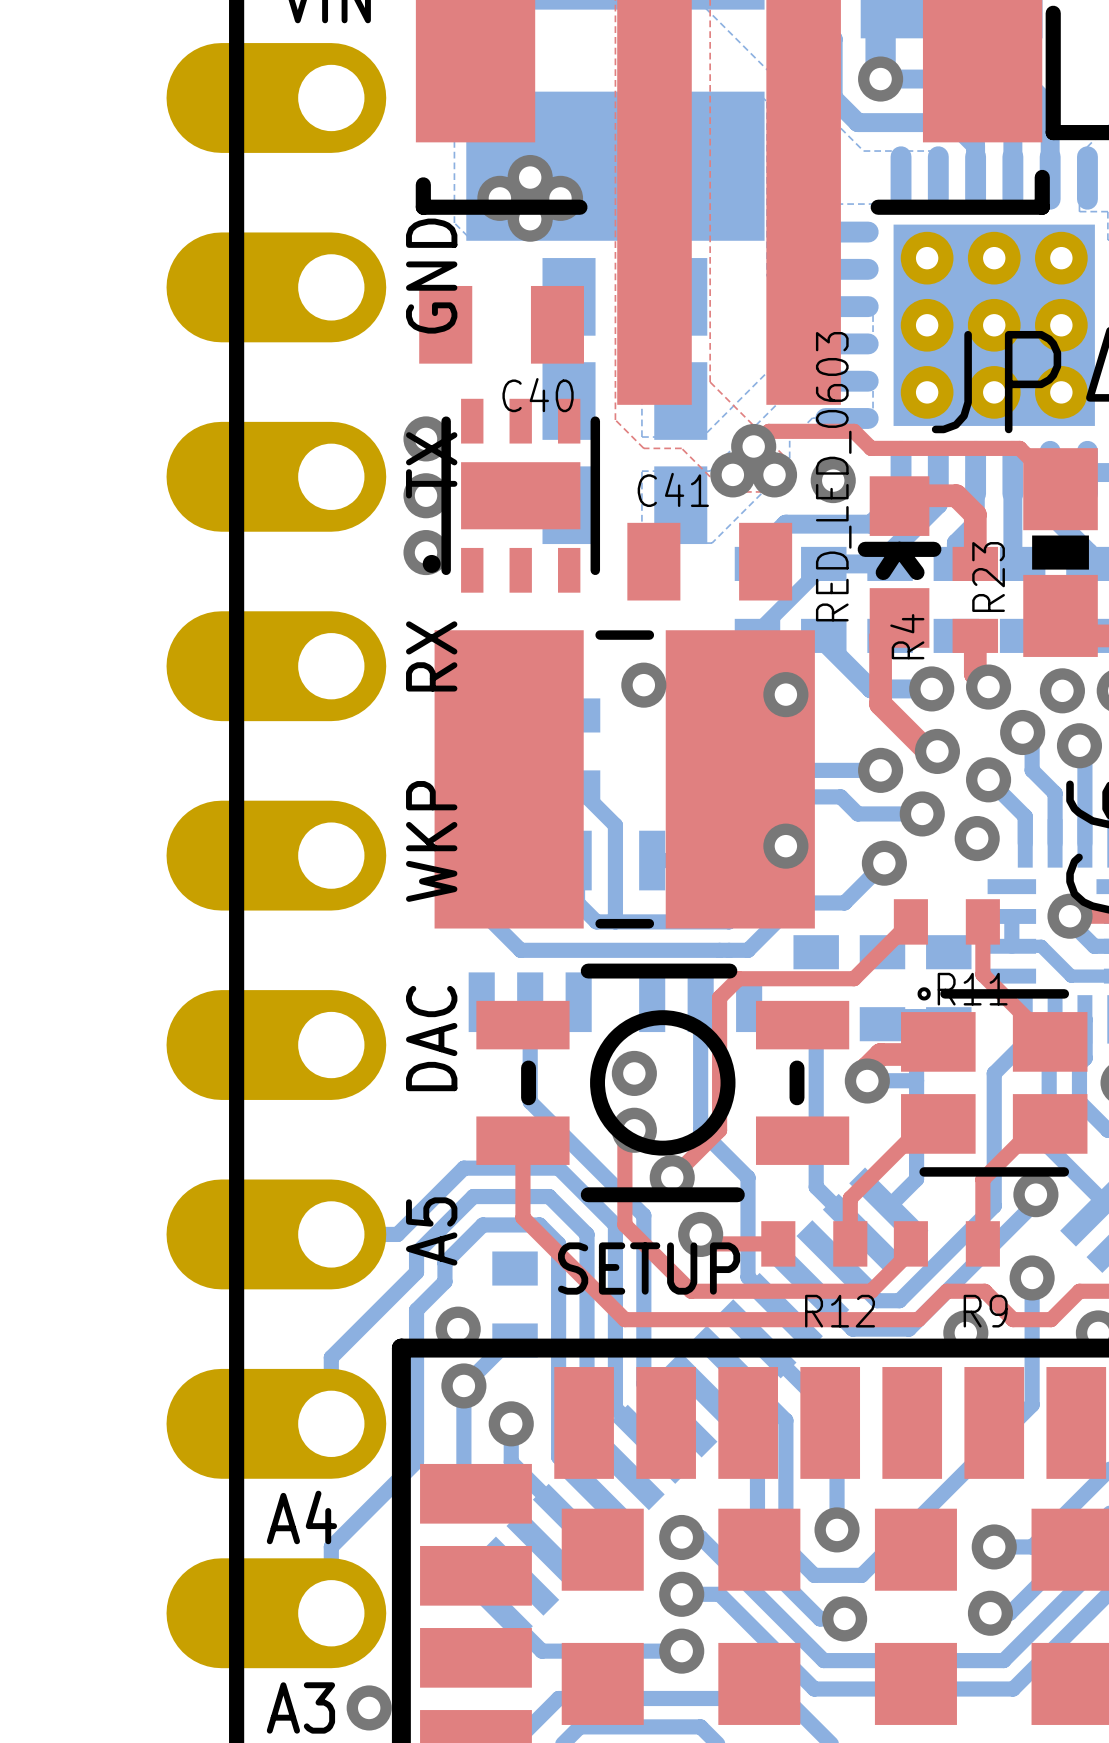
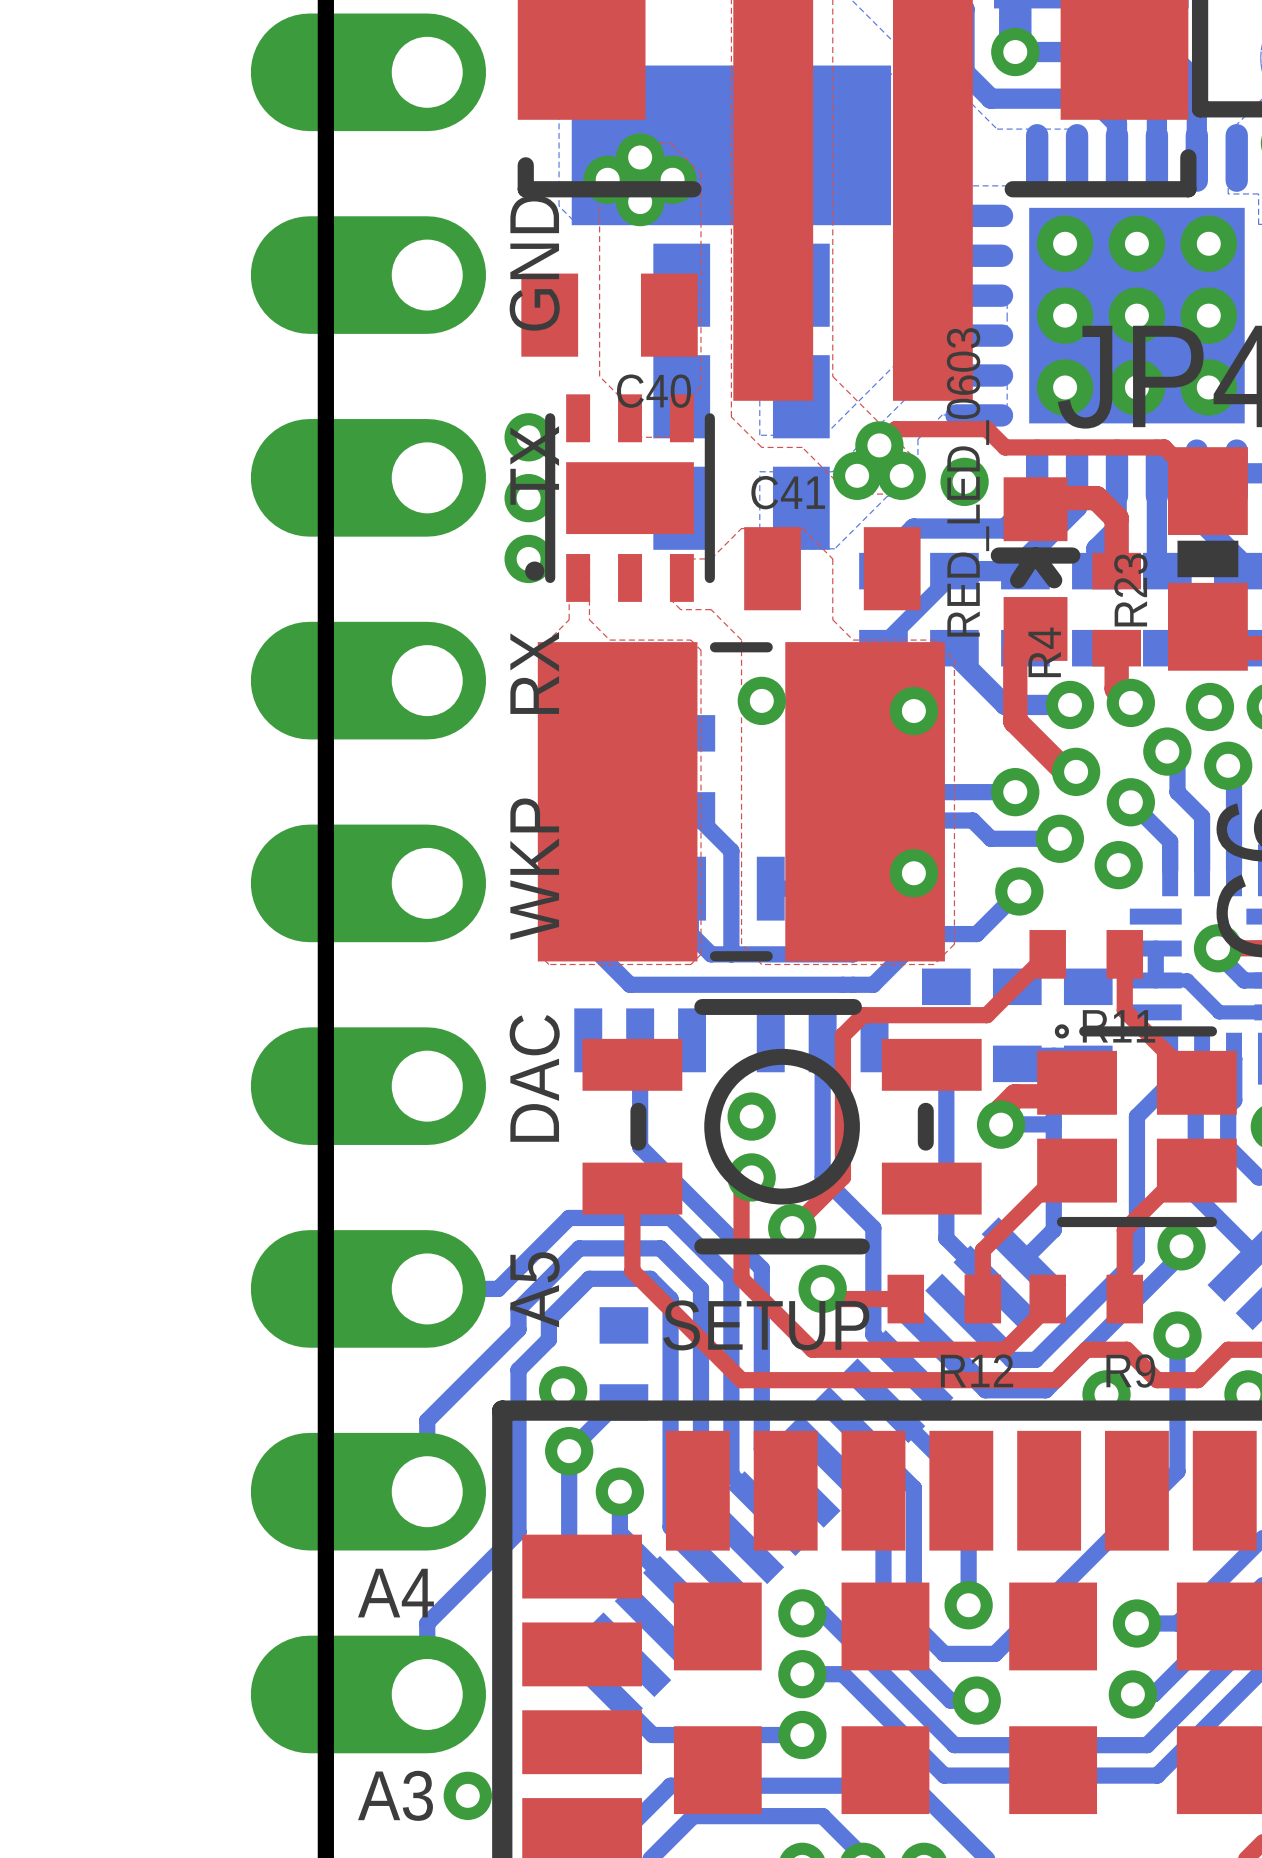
top zone outline: none -> (630, 143) (599, 173) (599, 376) (619, 396) (619, 437) (690, 437) (690, 396) (700, 386) (700, 173) (670, 143) (630, 143)
top zone outline: none -> (741, 528) (711, 558) (670, 558) (670, 599) (680, 609) (711, 609) (741, 640) (741, 944) (761, 964) (934, 964) (954, 944) (954, 660) (934, 640) (853, 640) (832, 619) (832, 558) (802, 528) (741, 528)
top zone outline: none -> (569, 558) (589, 558) (589, 619) (609, 640) (690, 640) (700, 650) (700, 954) (690, 964) (548, 964) (538, 954) (538, 650) (569, 619) (569, 558)

